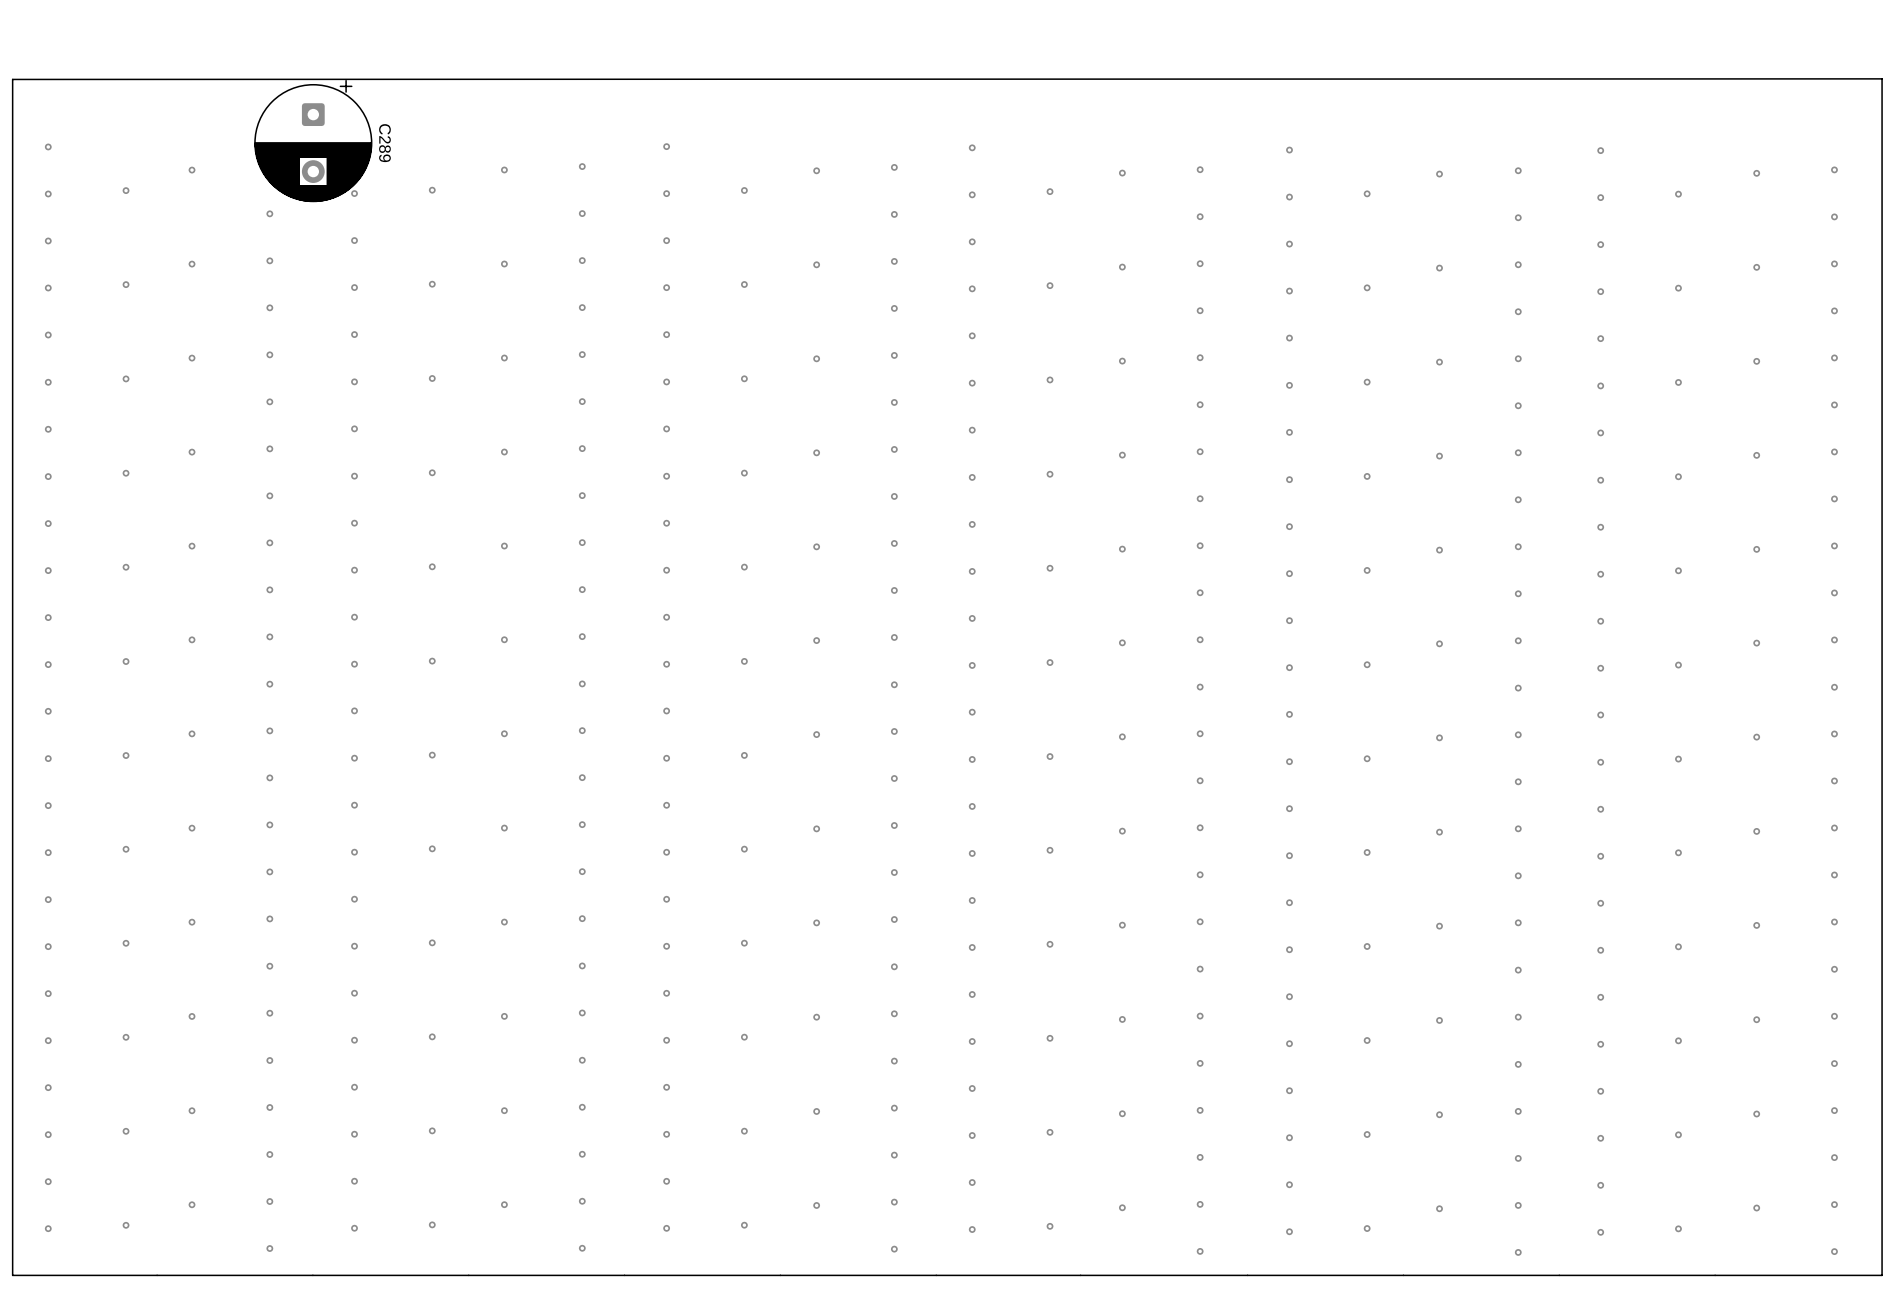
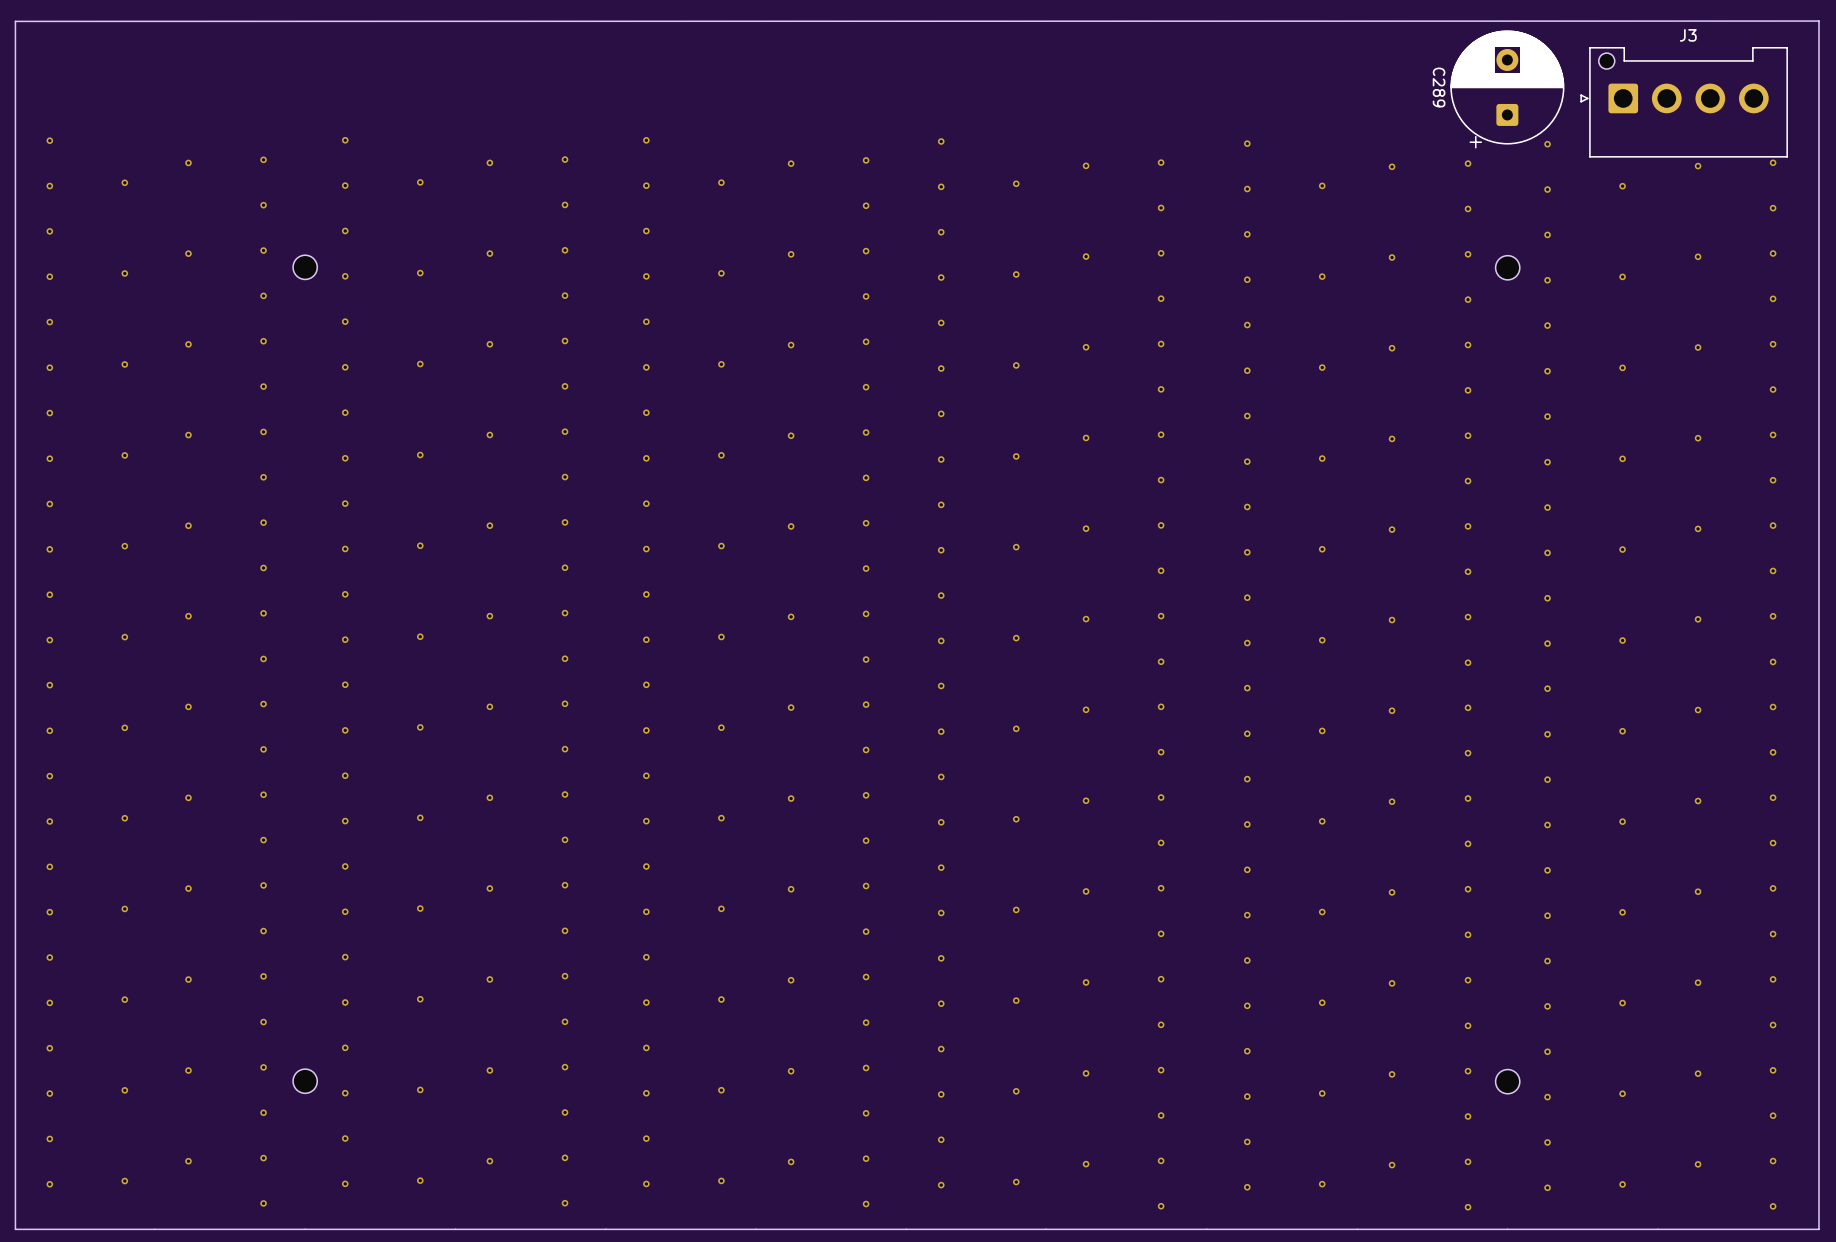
board edge: (1882, 78) (12, 79) (12, 1275) -> (1818, 74) (1818, 21) (15, 21) (15, 1229)
J3: none -> (1684, 102)
C289 rotation: 0° (313, 141) -> 180° (1507, 89)
C289 position: (313, 141) -> (1507, 89)
part: none -> (305, 267)
part: none -> (1507, 267)
part: none -> (305, 1081)
part: none -> (1507, 1081)

